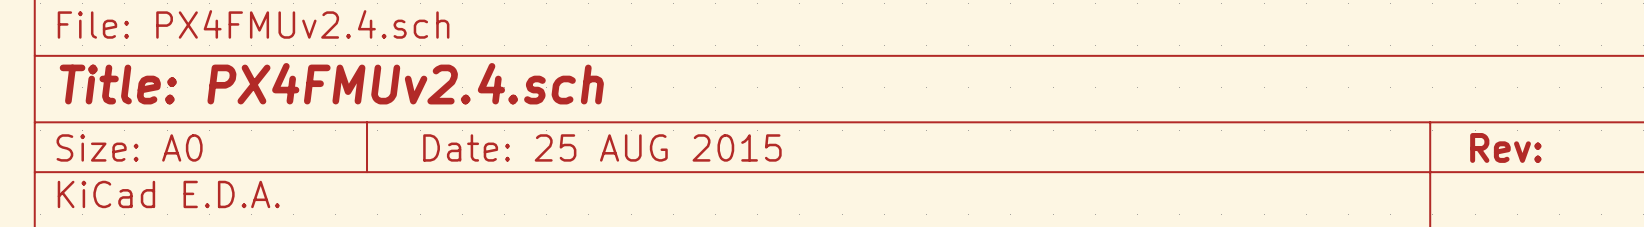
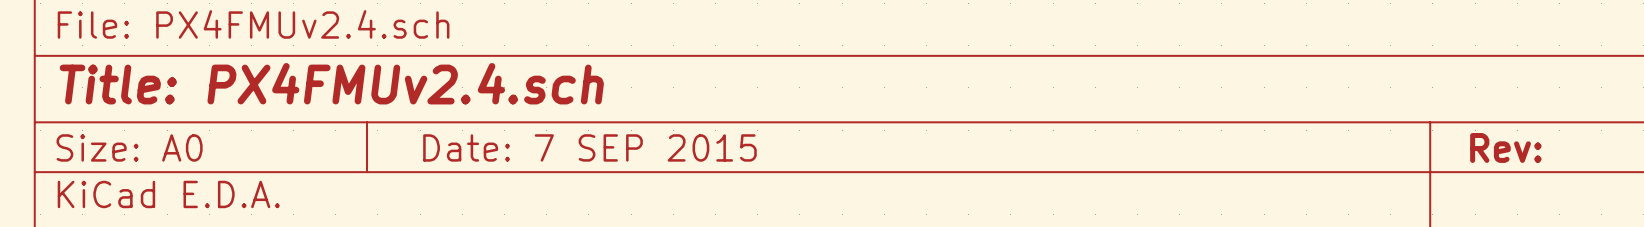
title block: Date: 25 AUG 2015 (602, 147) -> Date: 7 SEP 2015 (589, 147)

